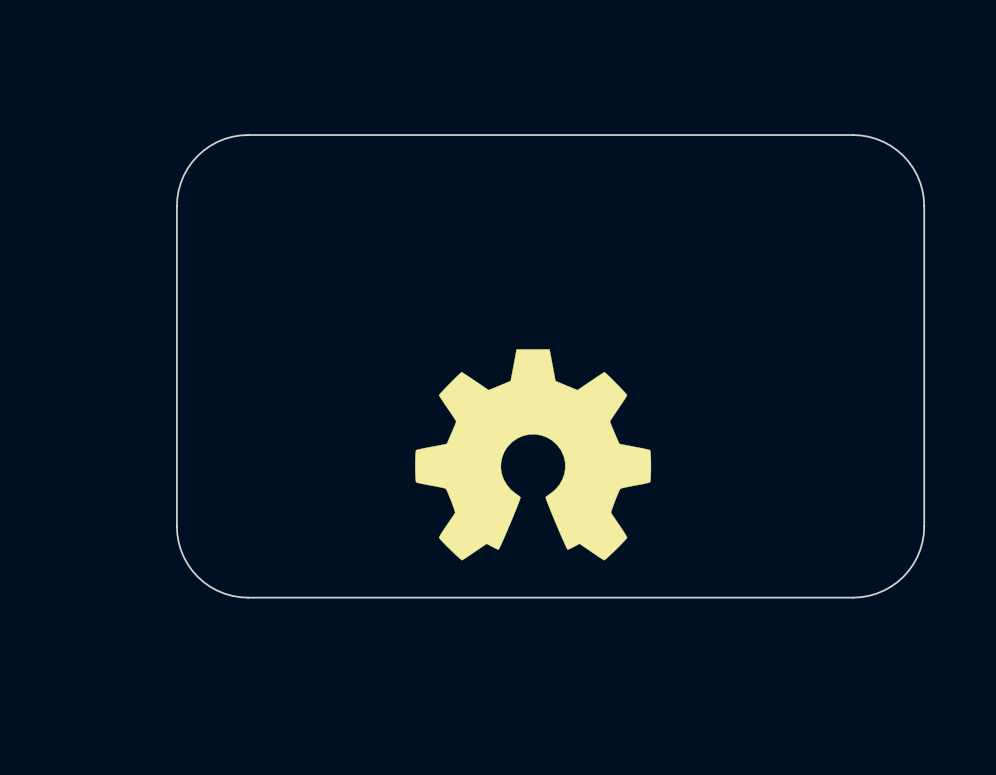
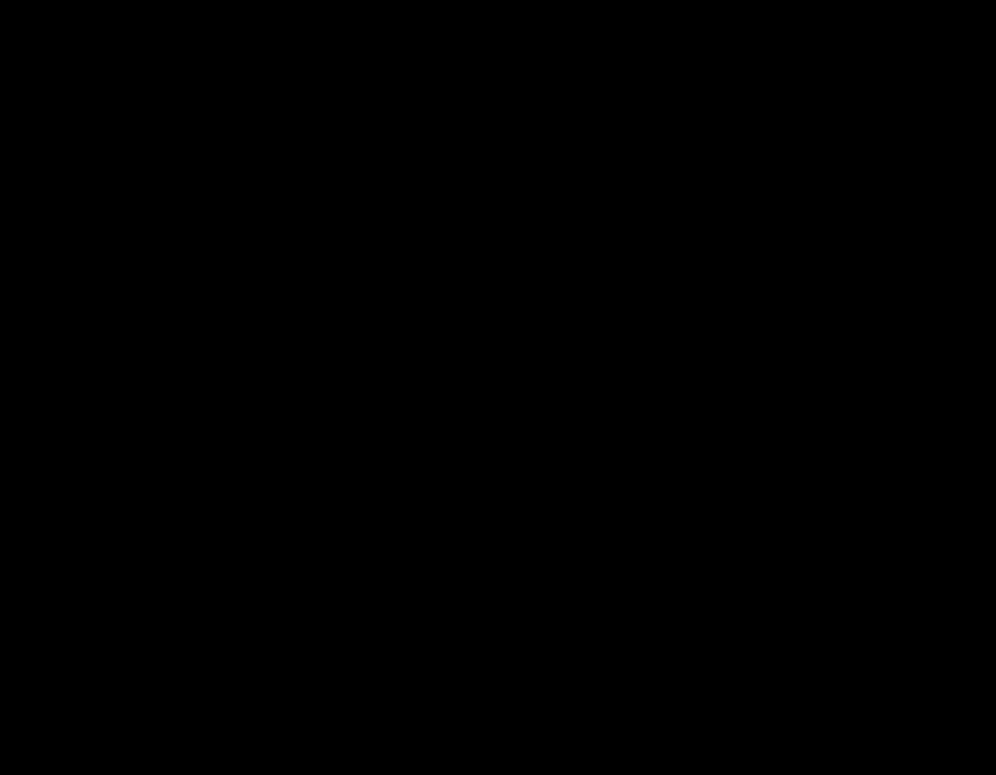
board edge: (248, 135) (853, 135) (868, 136) (890, 145) (903, 155) (913, 168) (920, 182) (924, 206) (924, 526) (920, 549) (913, 564) (903, 576) (883, 590) (868, 595) (853, 597) (248, 597) (224, 593) (210, 586) (197, 576) (187, 564) (180, 549) (177, 534) (177, 198) (183, 175) (197, 155) (217, 142) (232, 136) (248, 135) -> none
drawing: [415, 349, 652, 561] -> none

